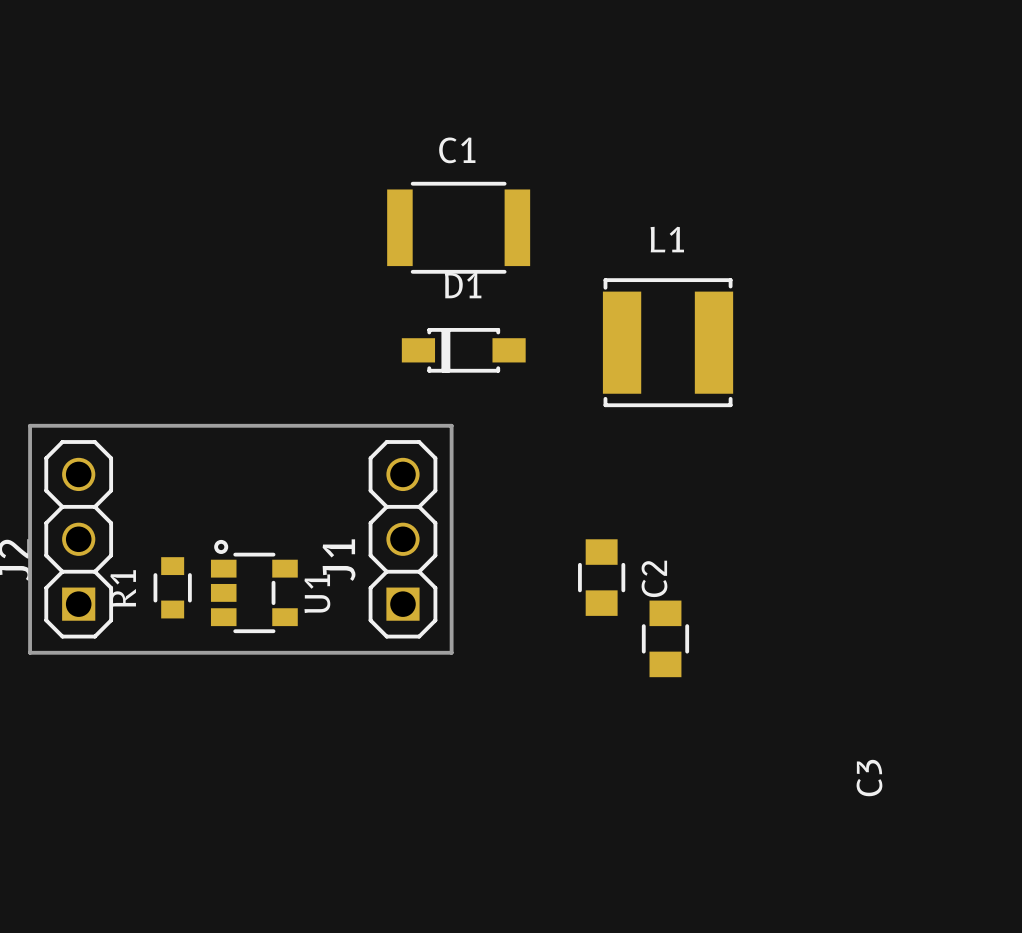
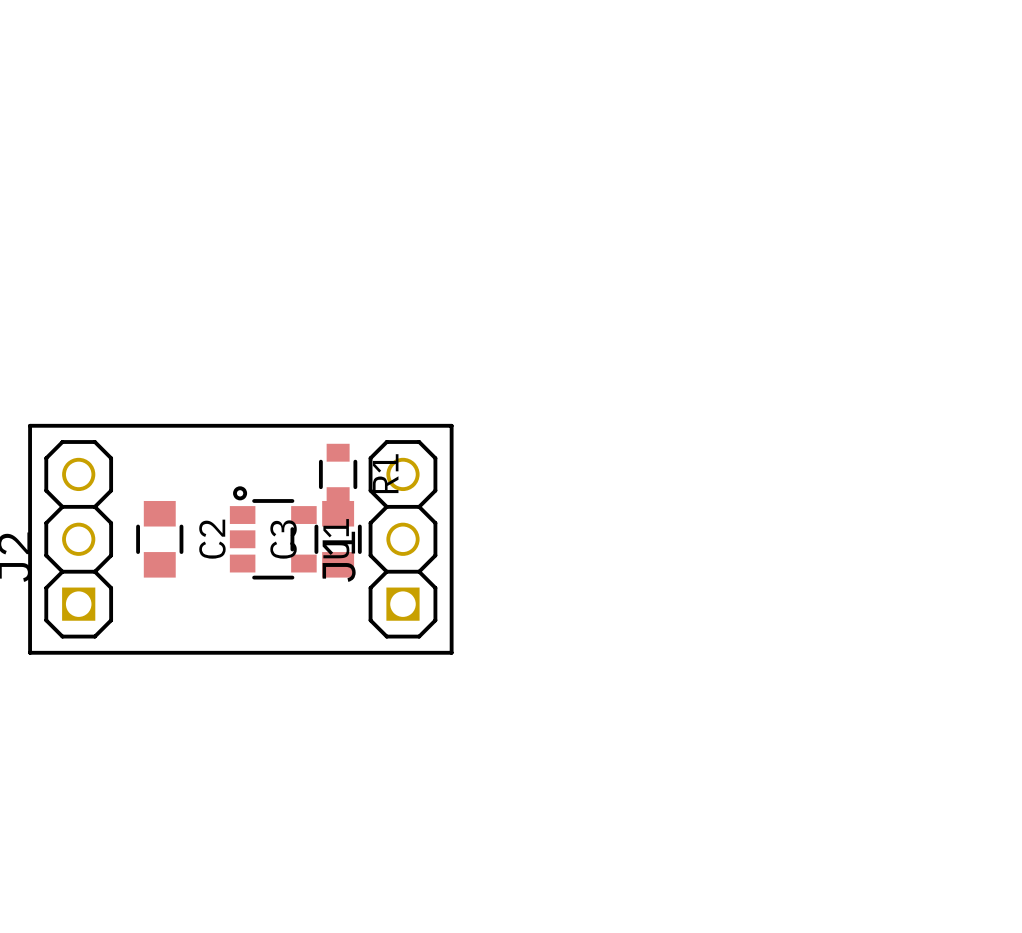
C1: (458, 227) -> none
L1: (668, 342) -> none
D1: (463, 350) -> none
C2 position: (601, 577) -> (159, 539)
U1 position: (254, 586) -> (273, 532)
R1 position: (172, 587) -> (338, 474)
R1 name position: R1 (123, 588) -> R1 (385, 473)
C3 position: (665, 638) -> (338, 539)
C3 name position: C3 (869, 778) -> C3 (283, 539)

